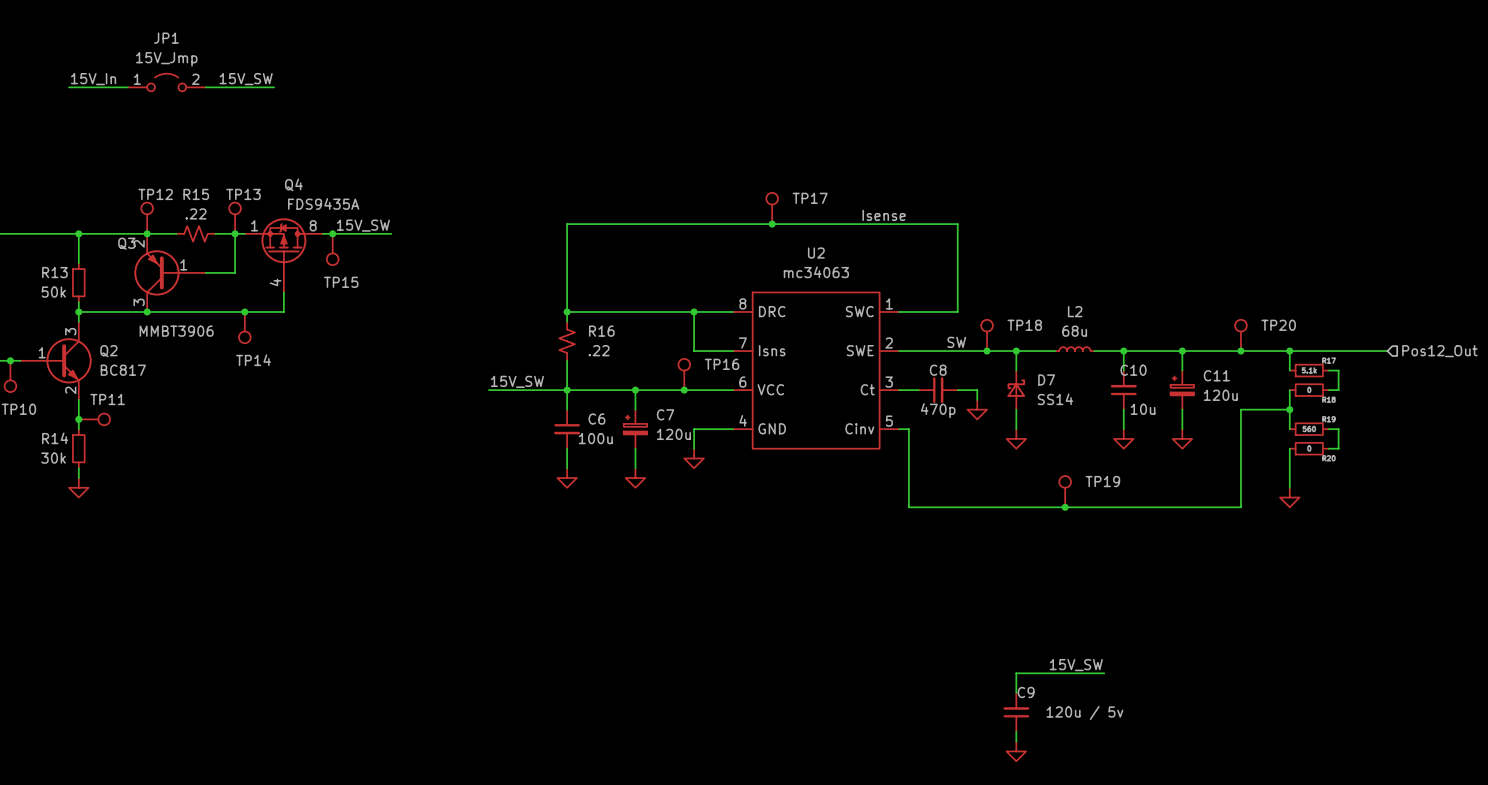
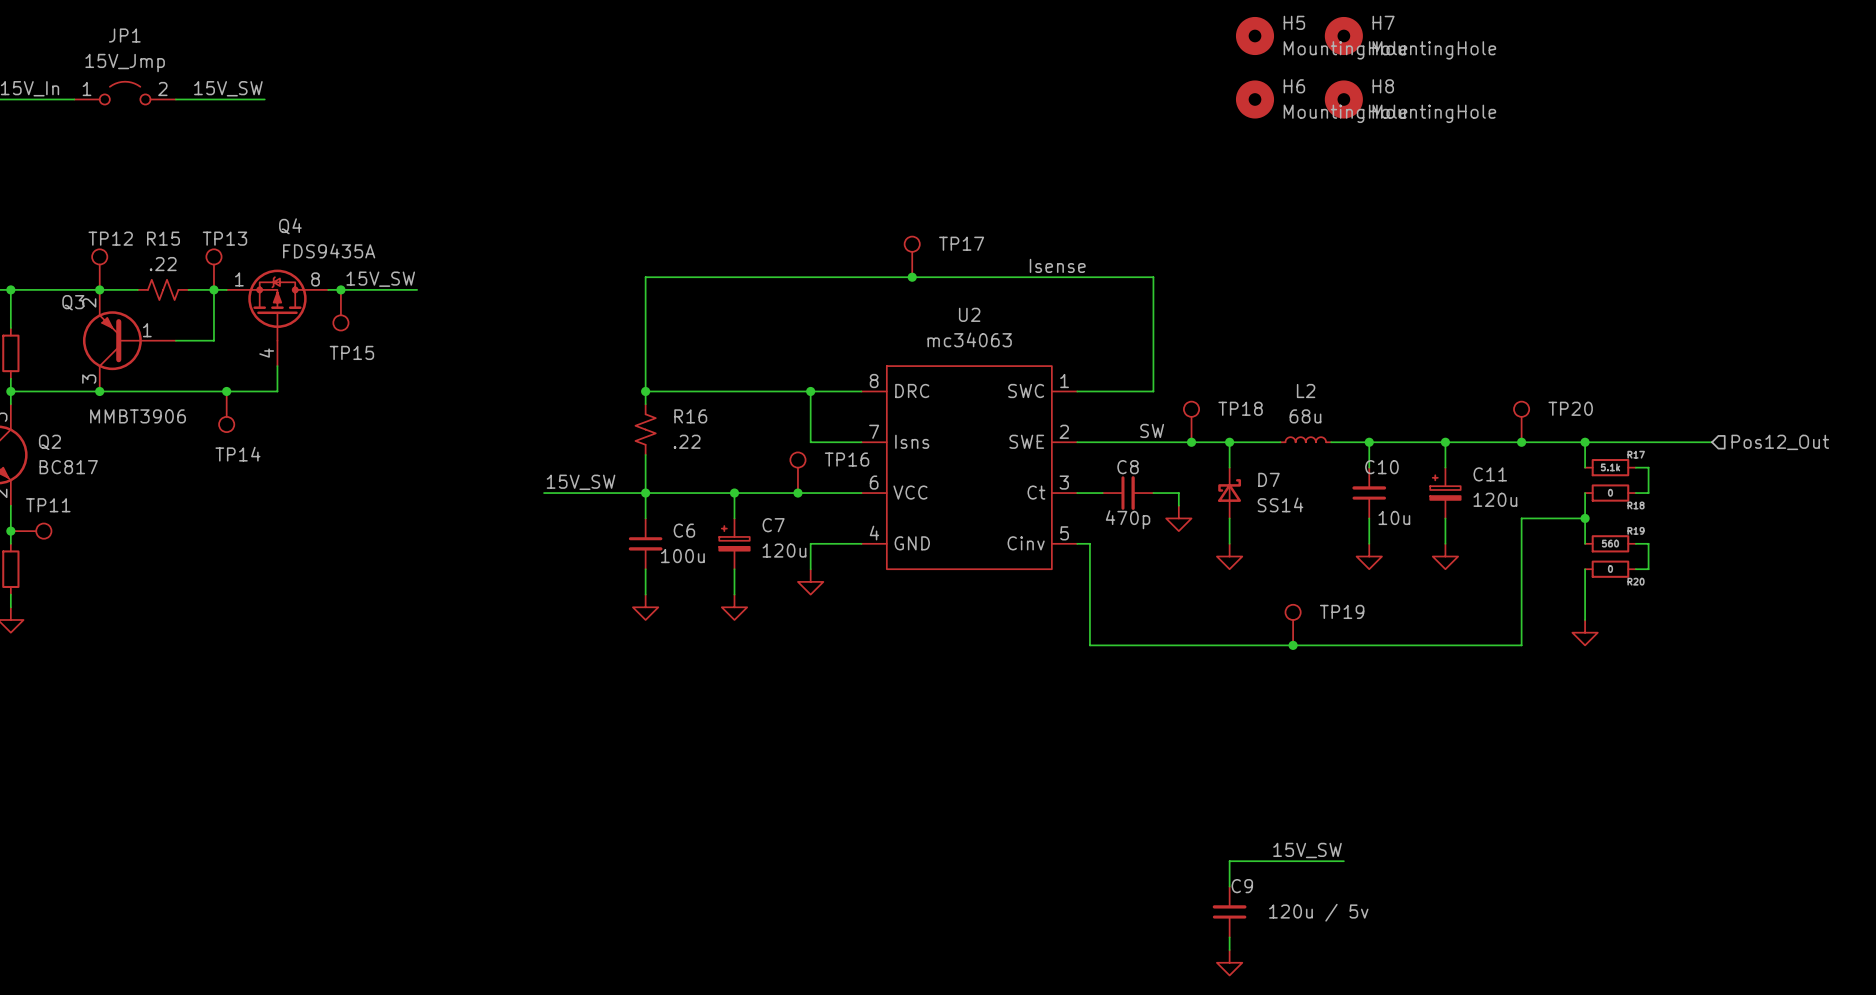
H5: none -> MountingHole (1255, 36)
H7: none -> MountingHole (1343, 36)
H6: none -> MountingHole (1255, 99)
H8: none -> MountingHole (1343, 99)

